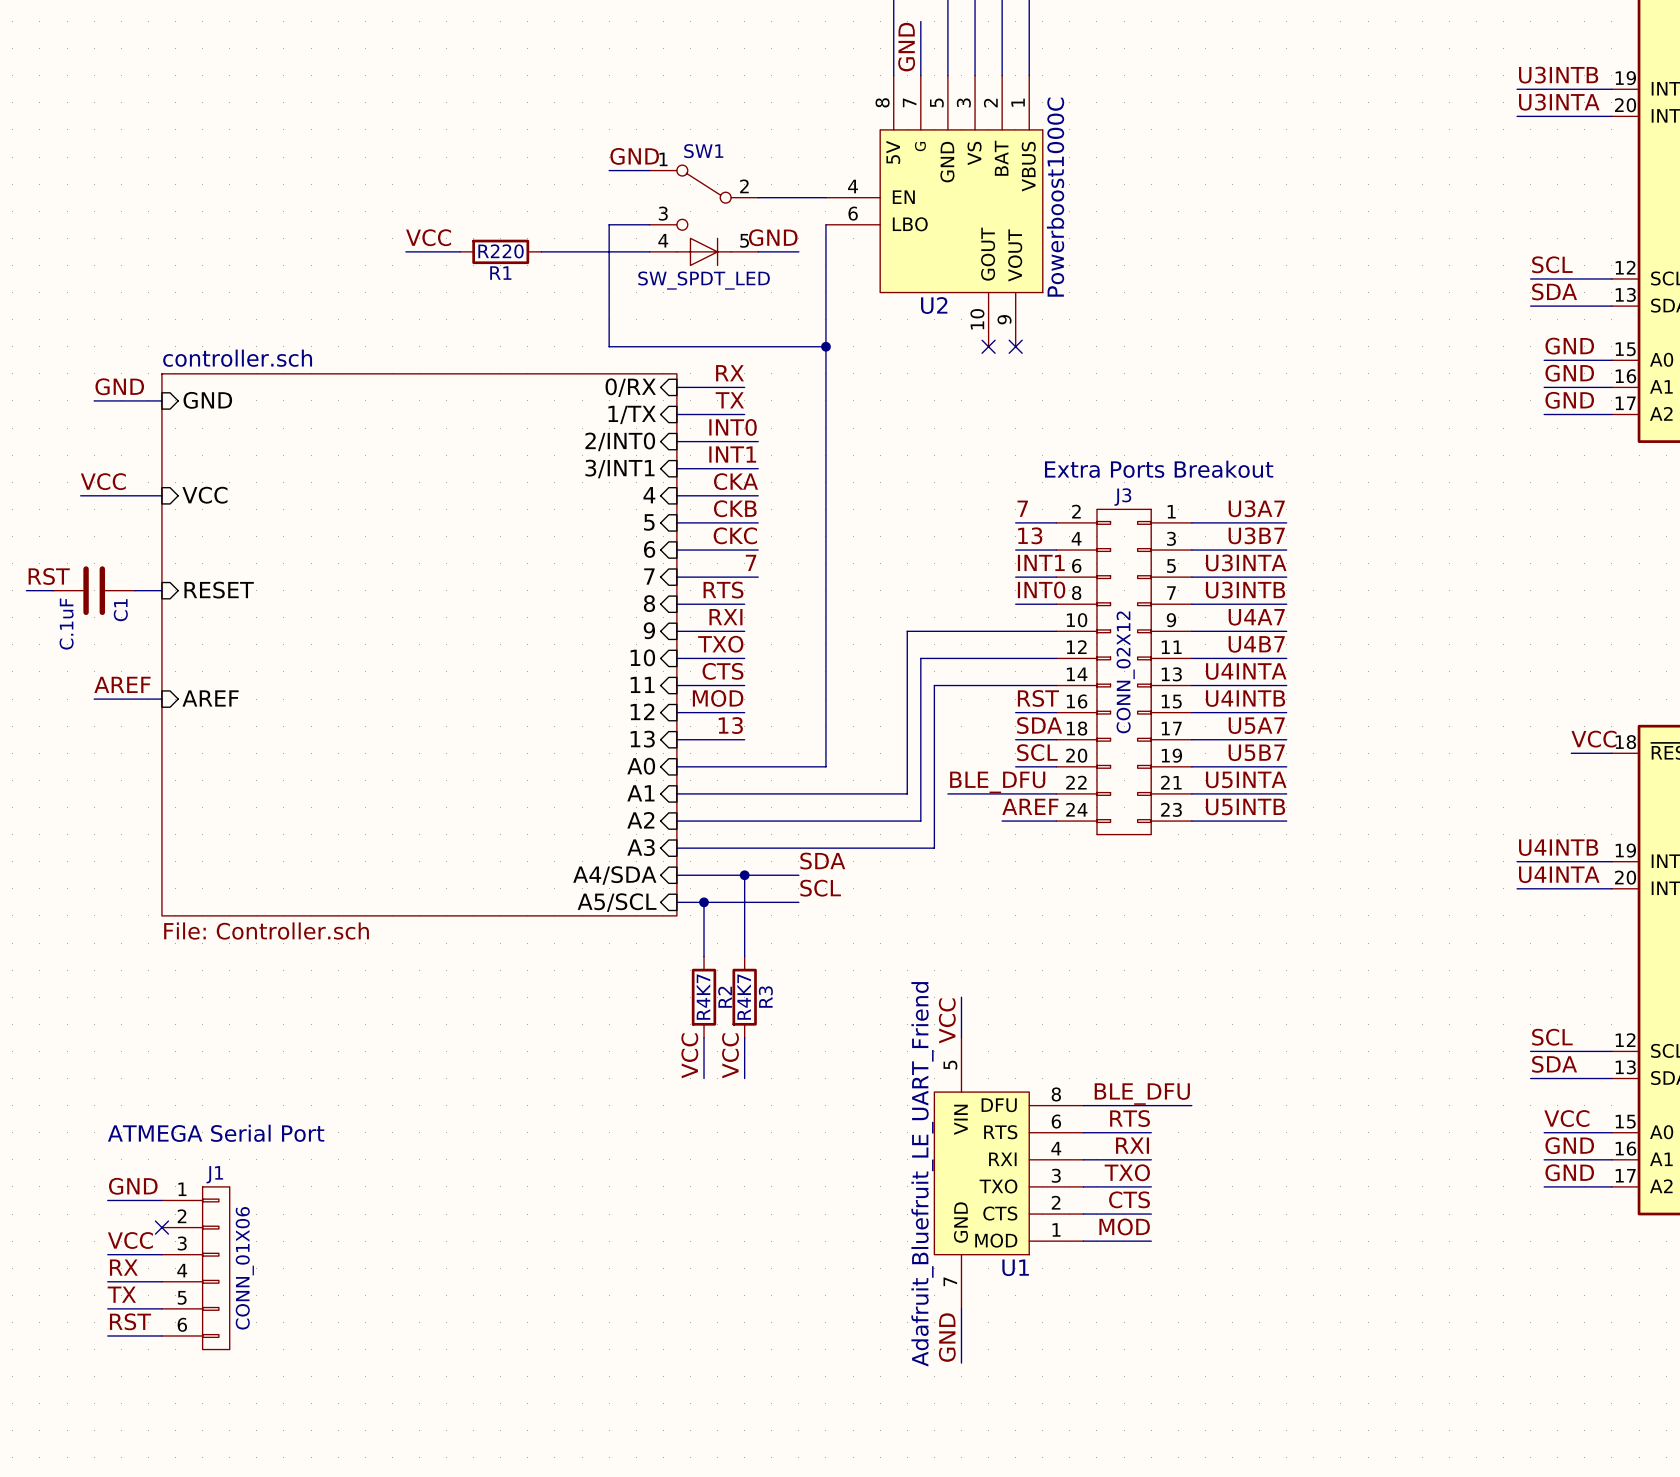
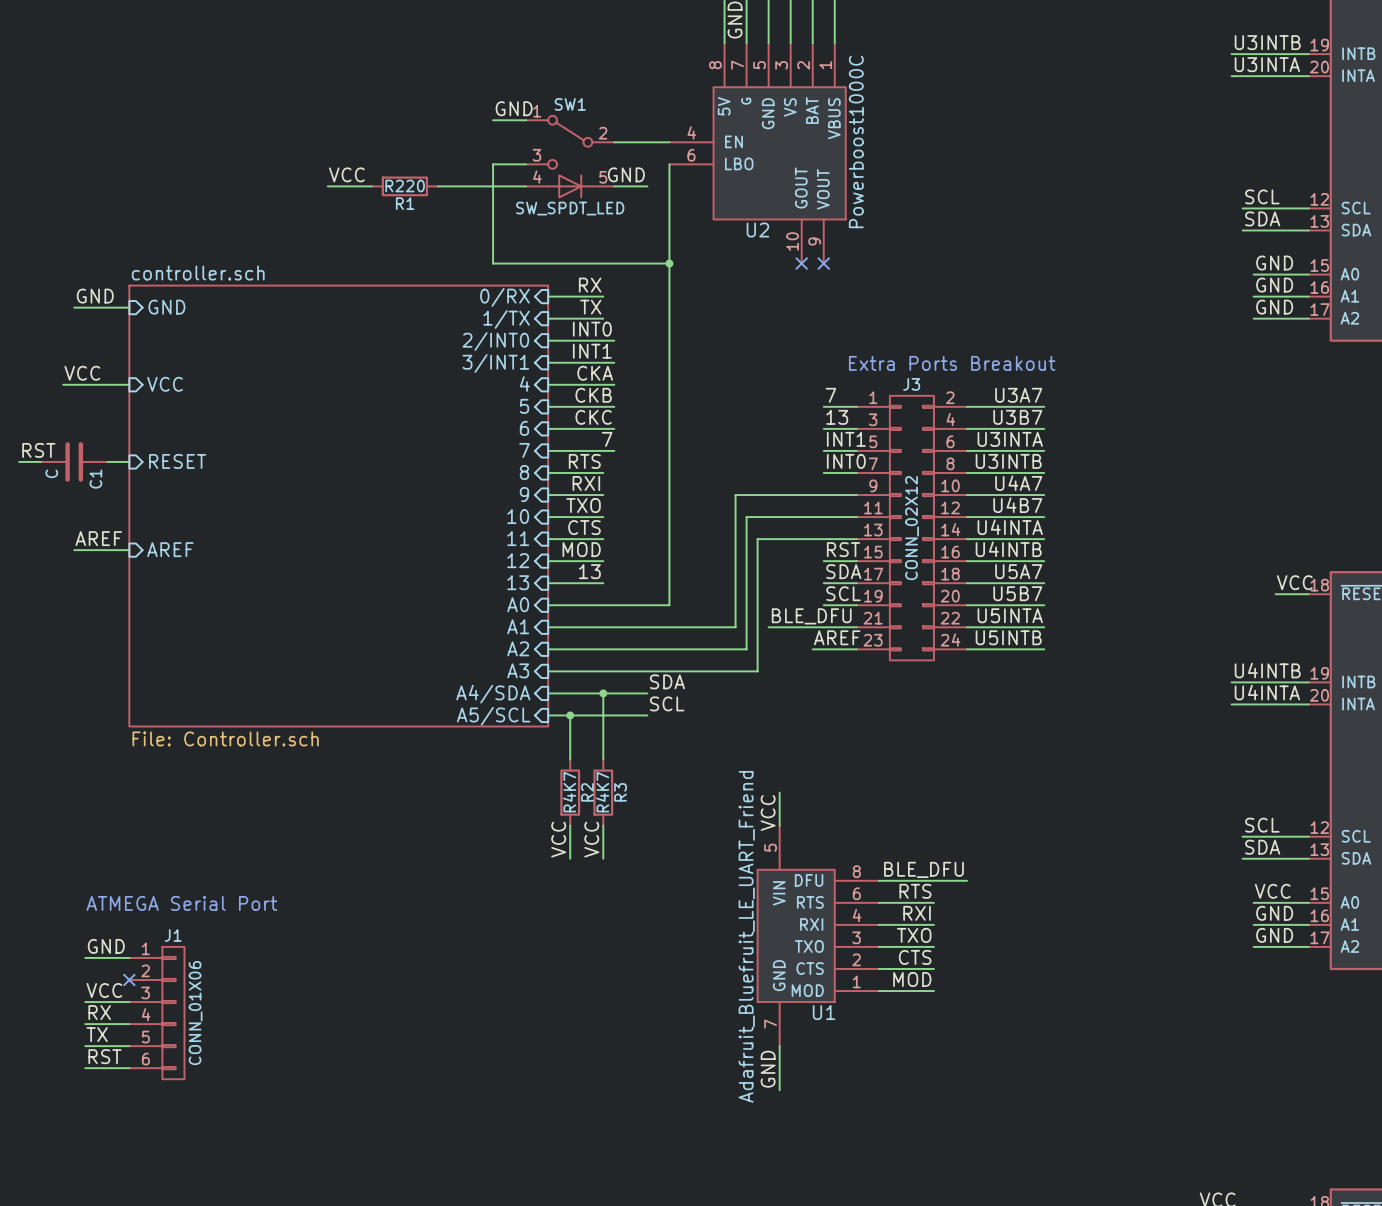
C1 value: C.1uF (66, 624) -> C (51, 473)
J3 flip: as is (1124, 671) -> left-right (911, 528)

